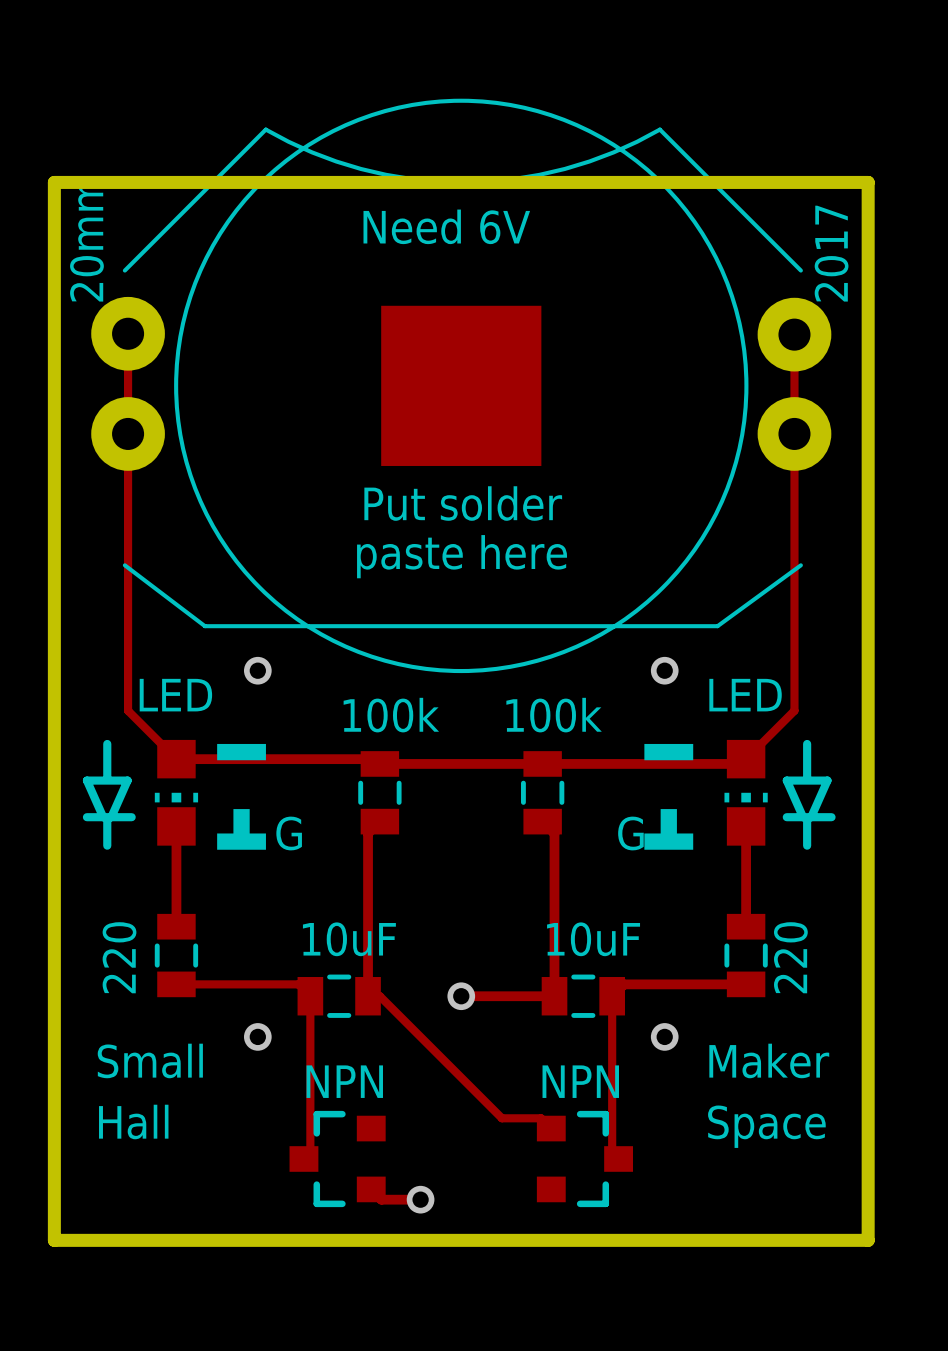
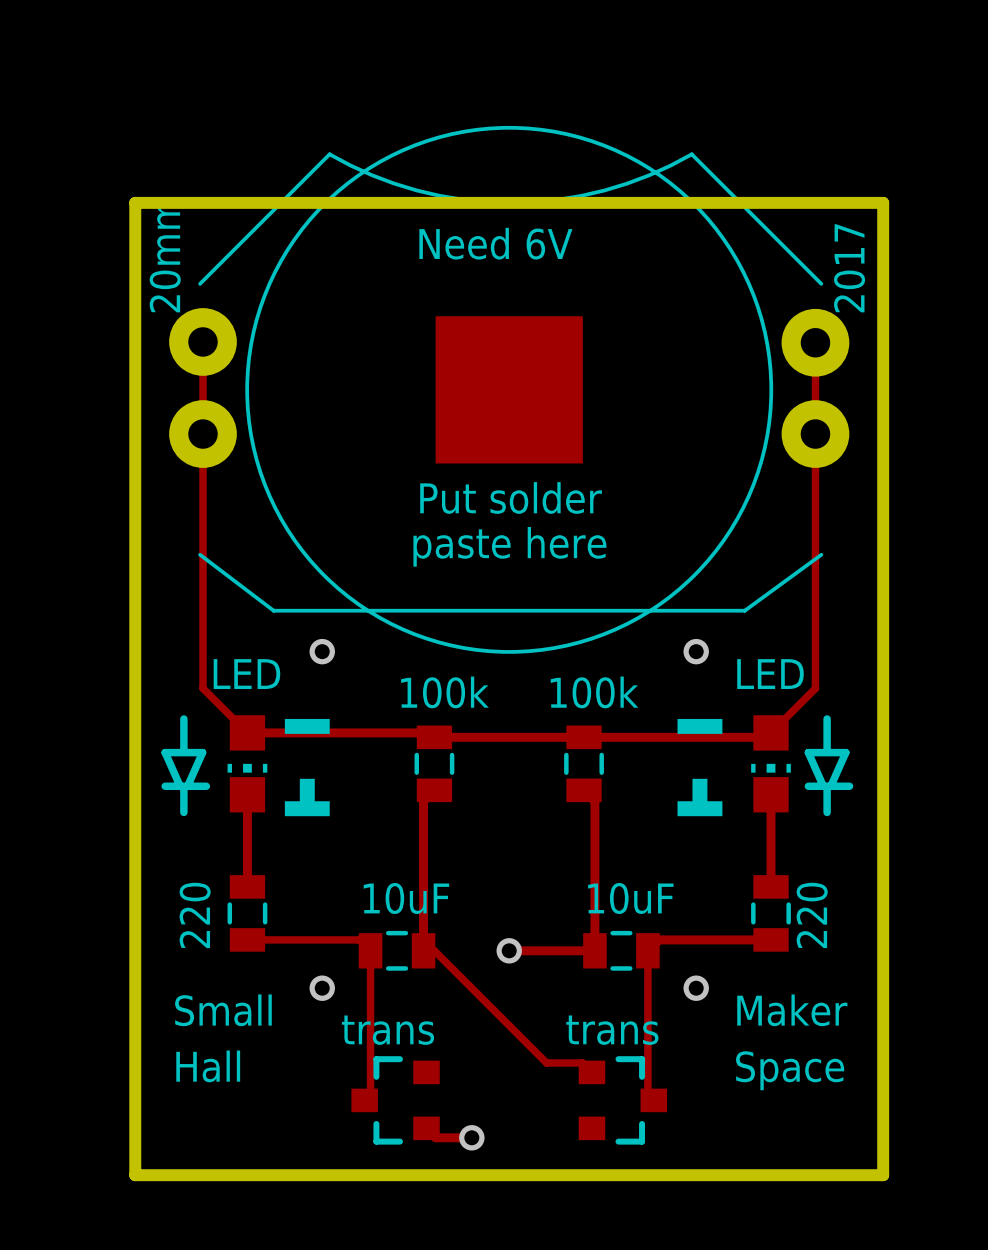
text: G (289, 833) -> none
text: G (630, 833) -> none
text: NPN (344, 1081) -> trans (388, 1030)
text: NPN (580, 1081) -> trans (612, 1030)

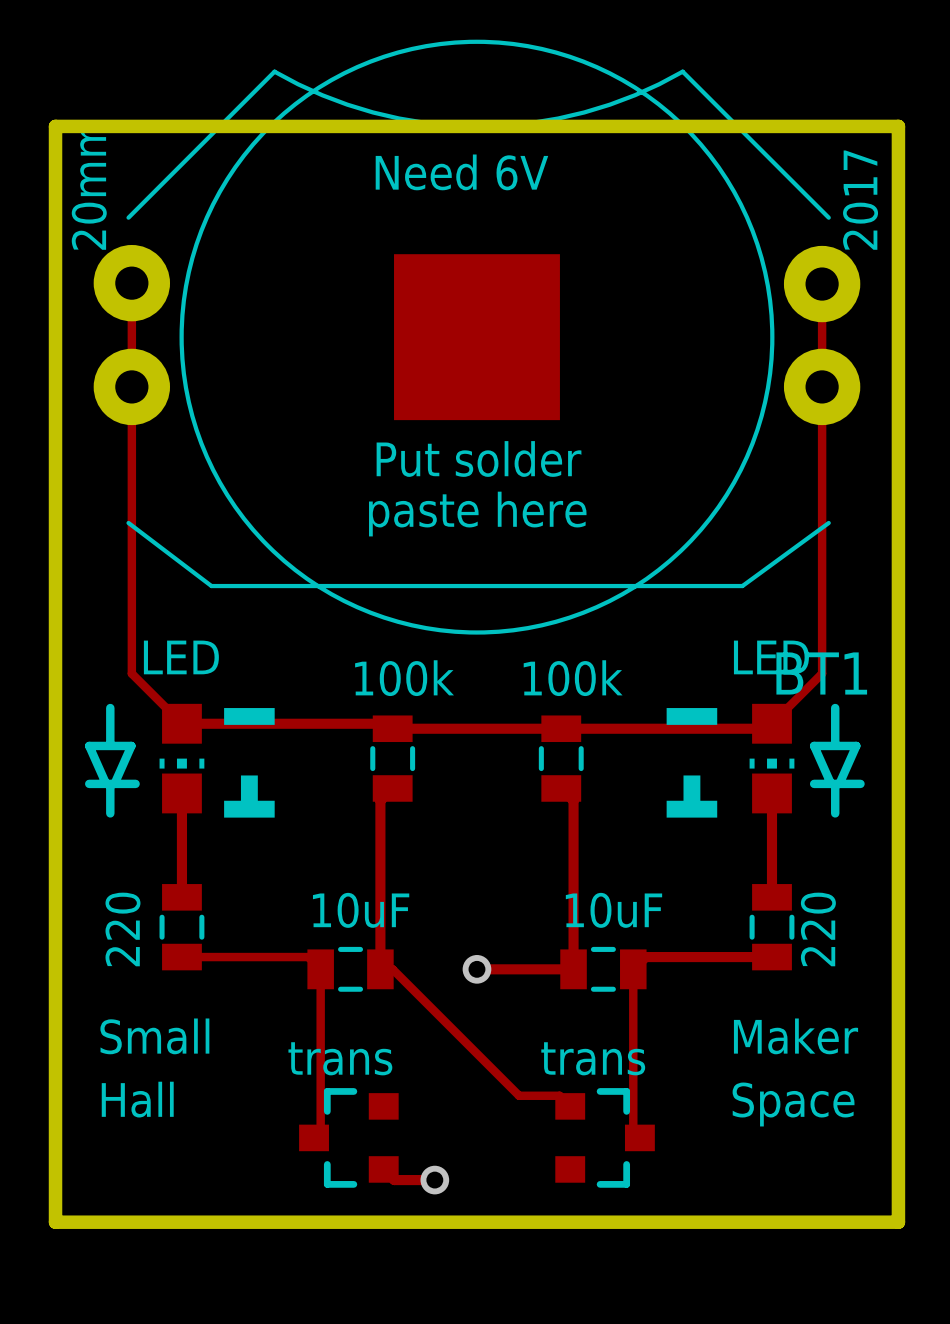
via: (322, 651) -> none
via: (696, 651) -> none
BT1 name: none -> BT1 (821, 673)
via: (322, 988) -> none
via: (696, 988) -> none

